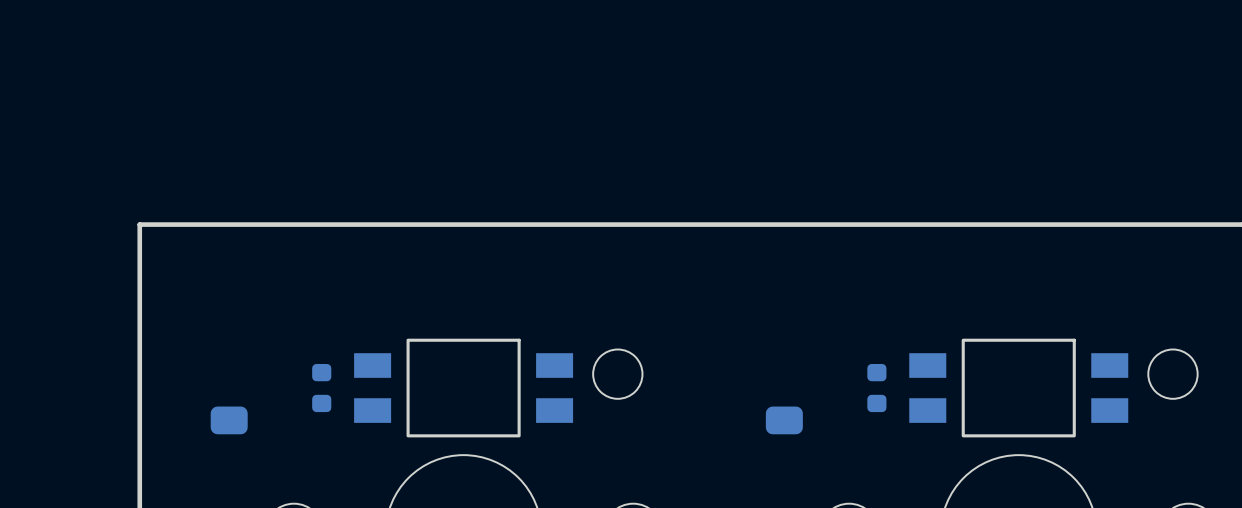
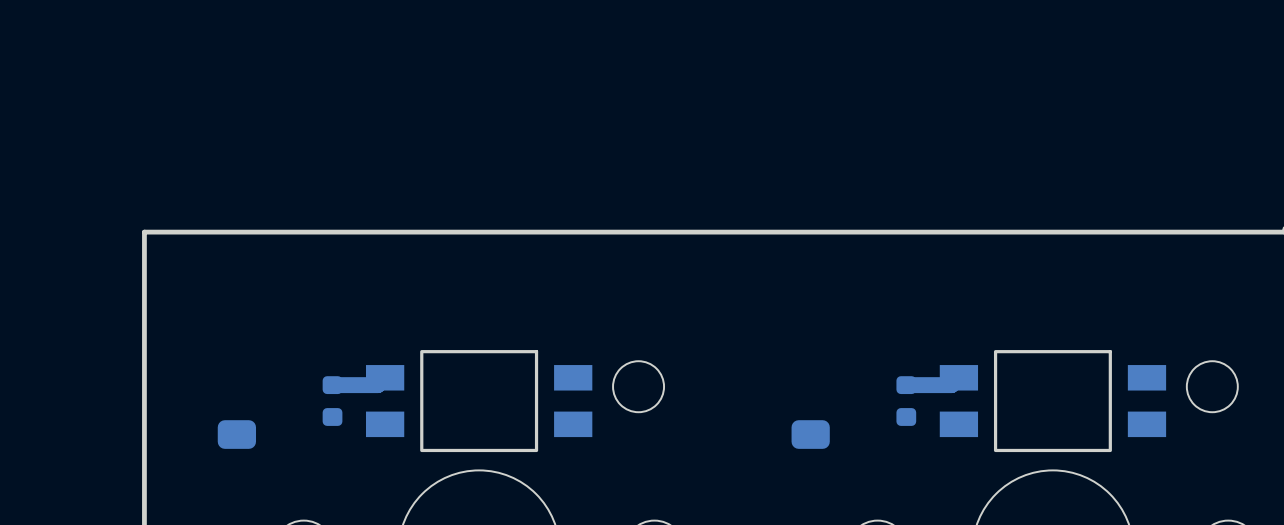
bottom track: none -> (385, 377) (377, 385) (332, 385)
bottom track: none -> (958, 377) (951, 385) (906, 385)

